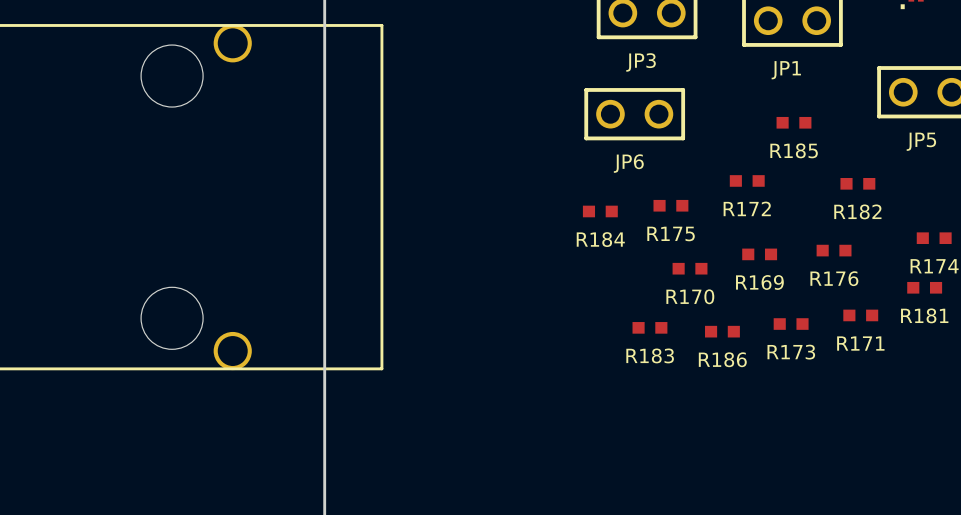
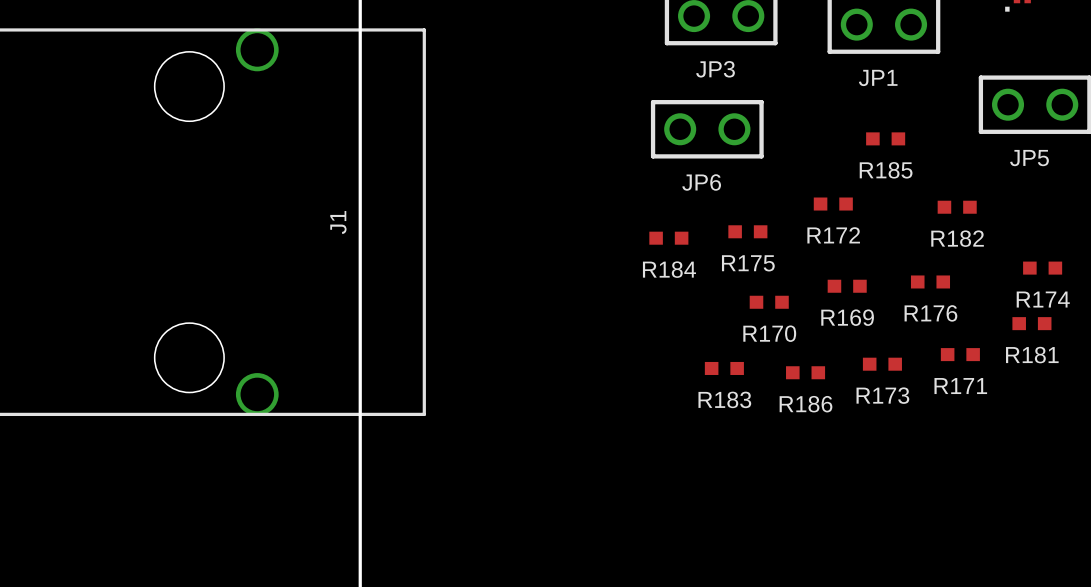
J1 name: none -> J1 (338, 222)

